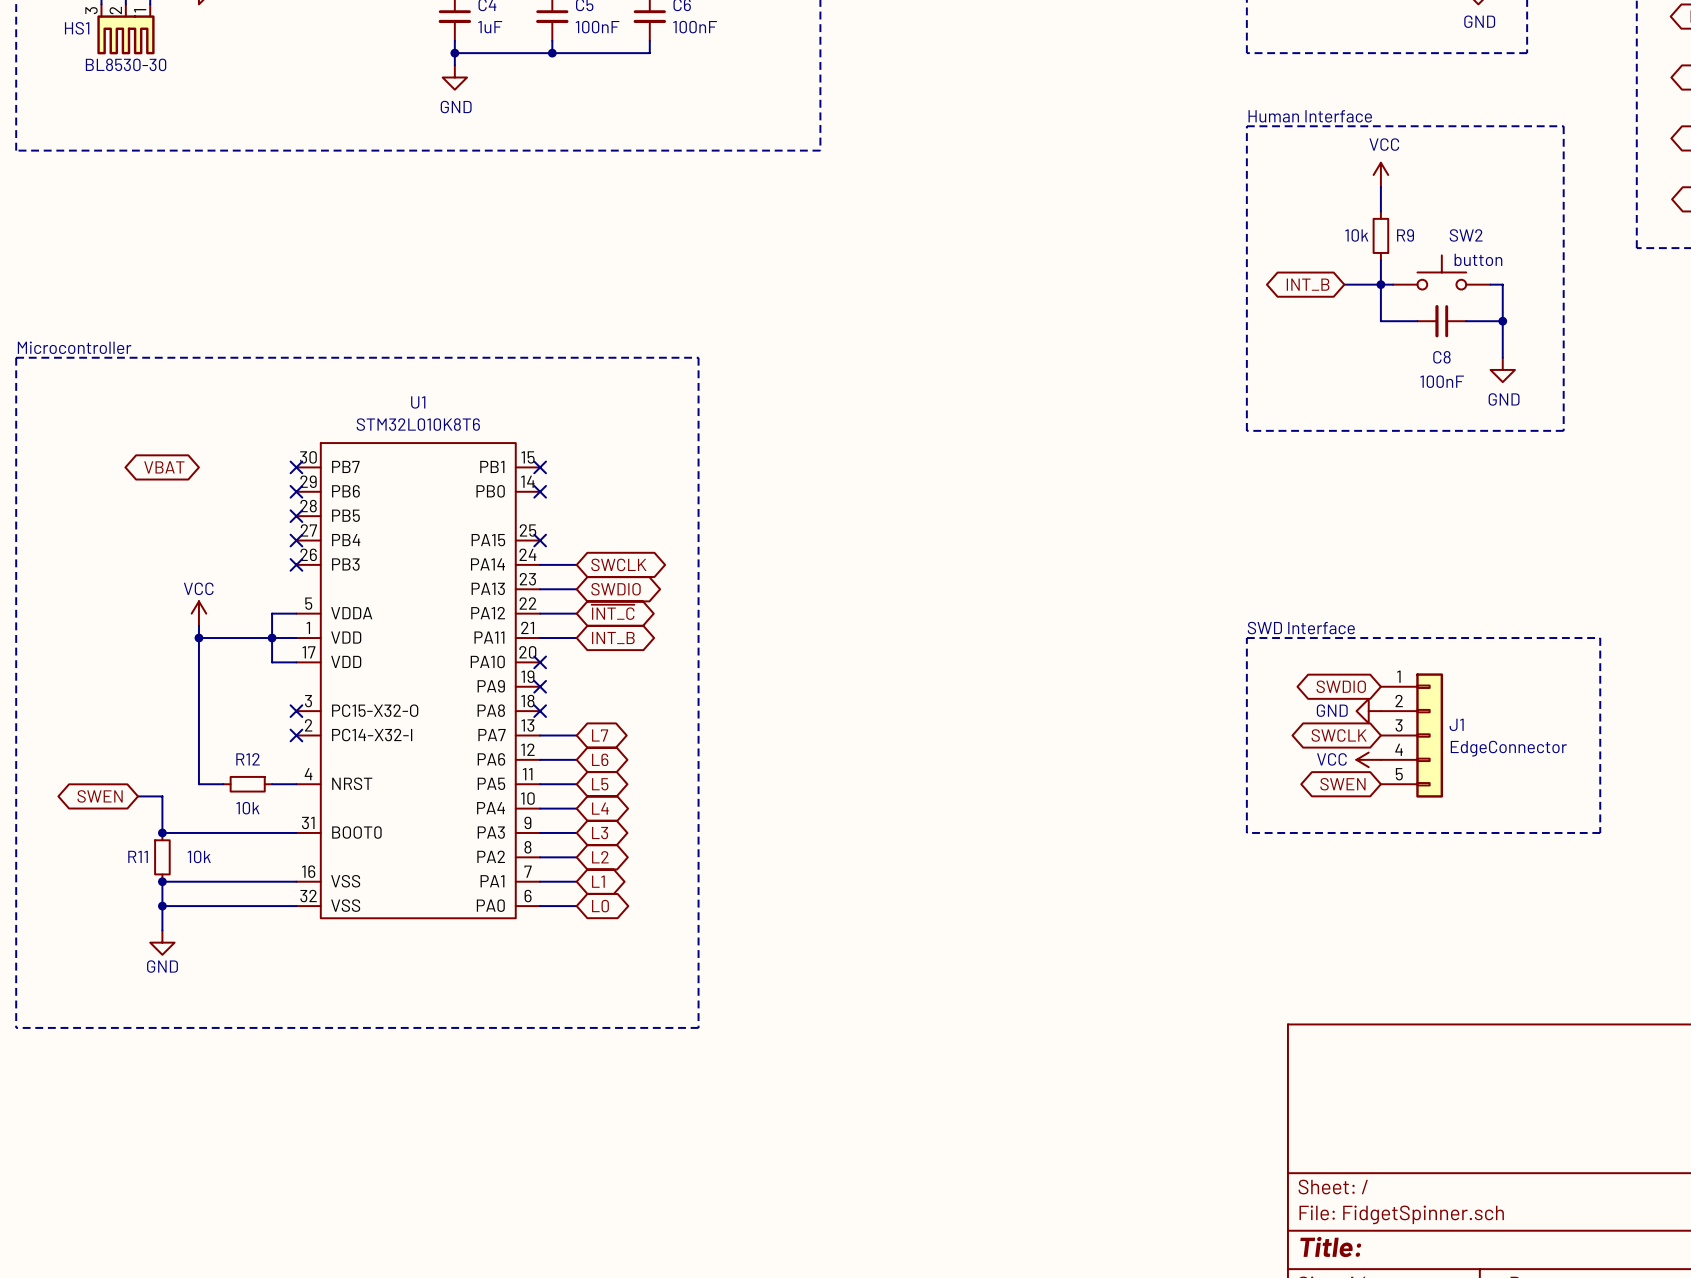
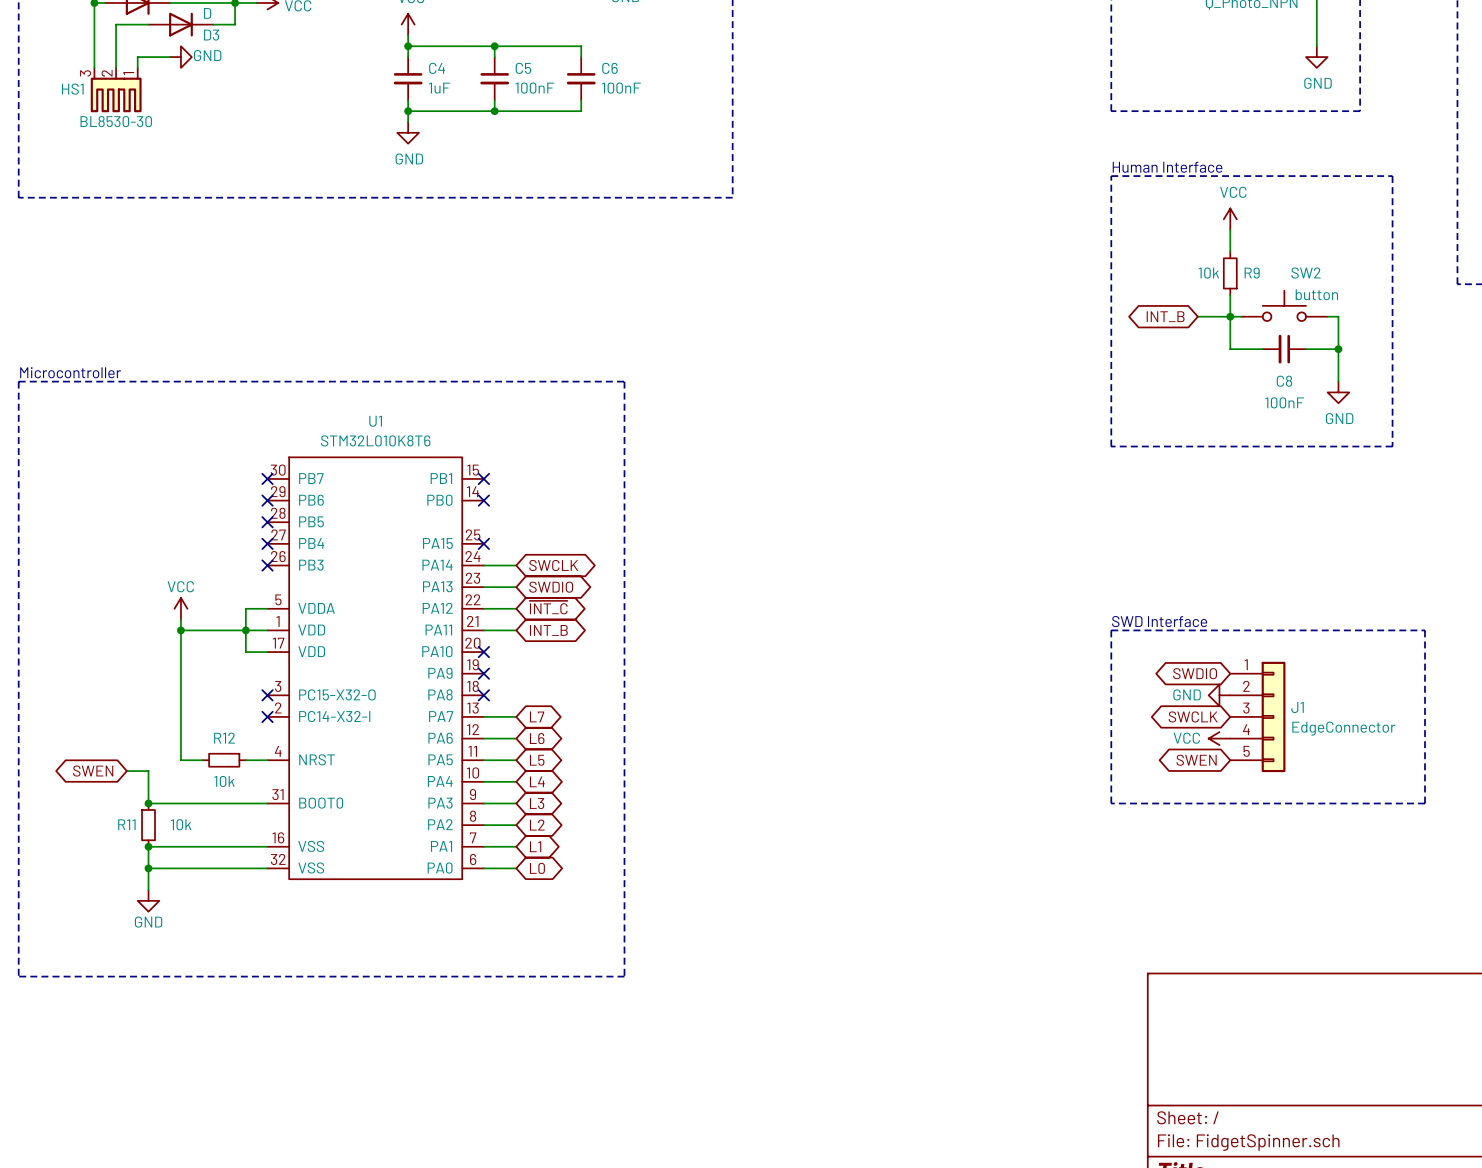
global label: VBAT (164, 467) -> none

